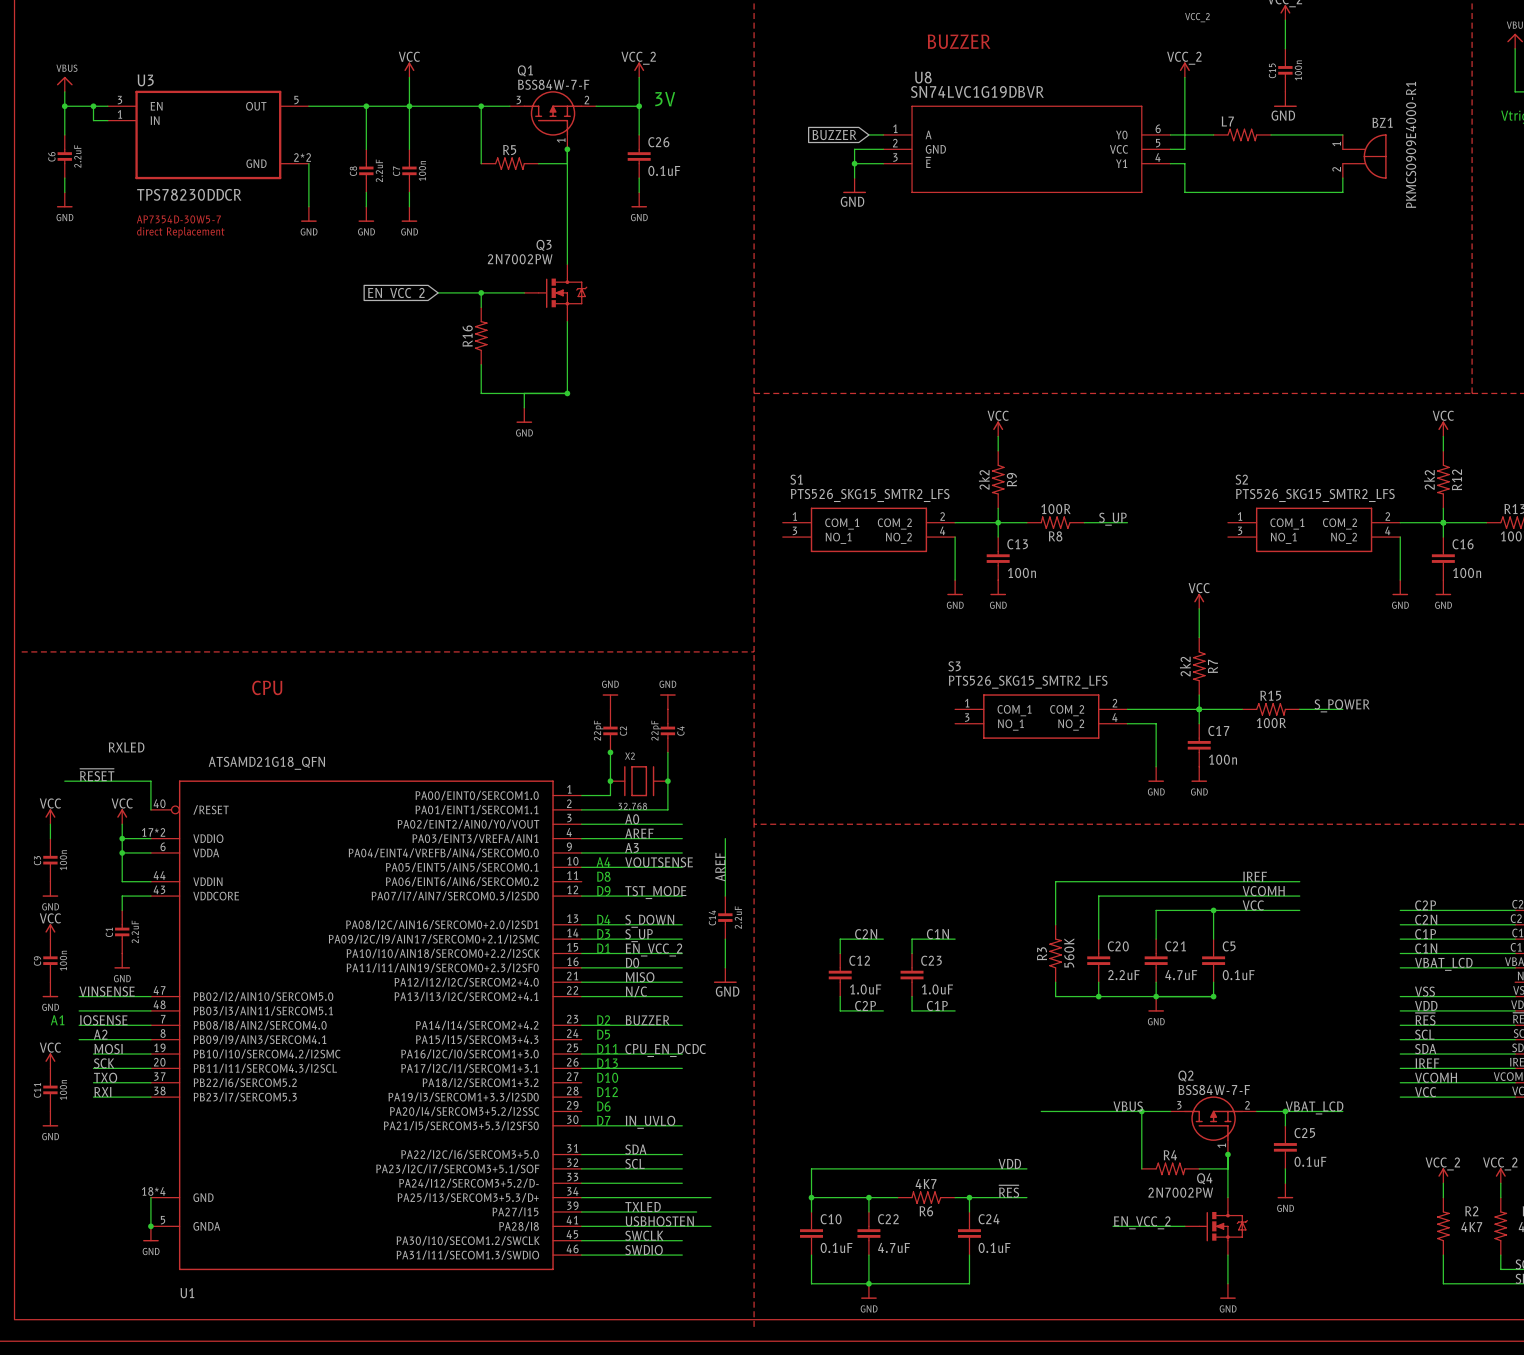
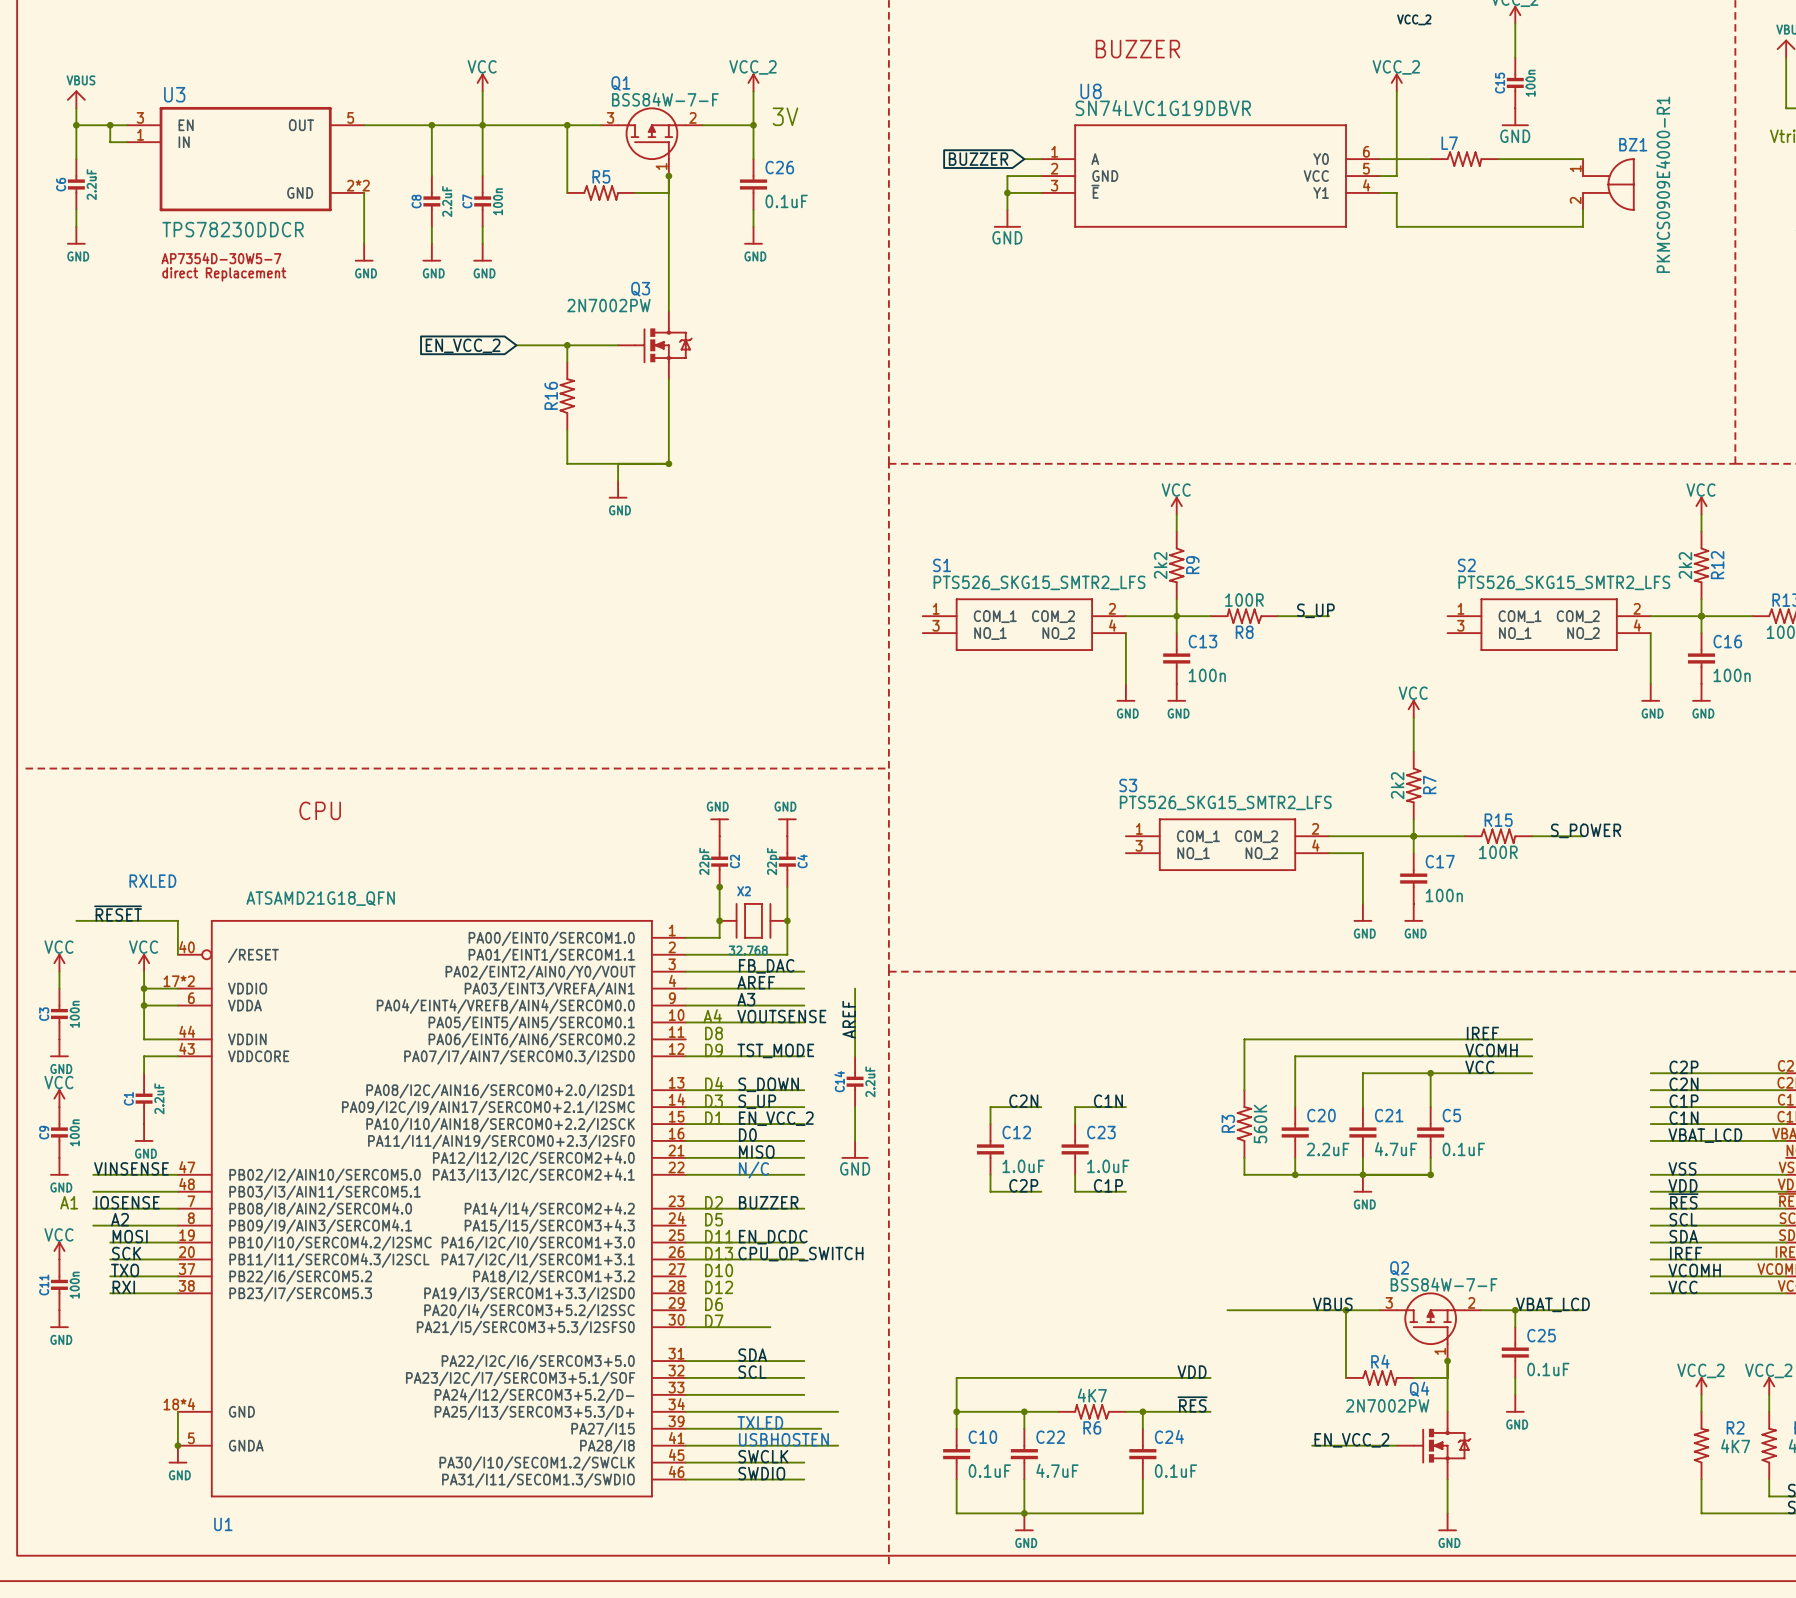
label: A0 (632, 819) -> FB_DAC (766, 966)
label: CPU_EN_DCDC (665, 1050) -> EN_DCDC (773, 1237)
label: none -> CPU_OP_SWITCH (800, 1254)
label: IN_UVLO (650, 1122) -> none
wire: (653, 1125) (682, 1125) -> none

